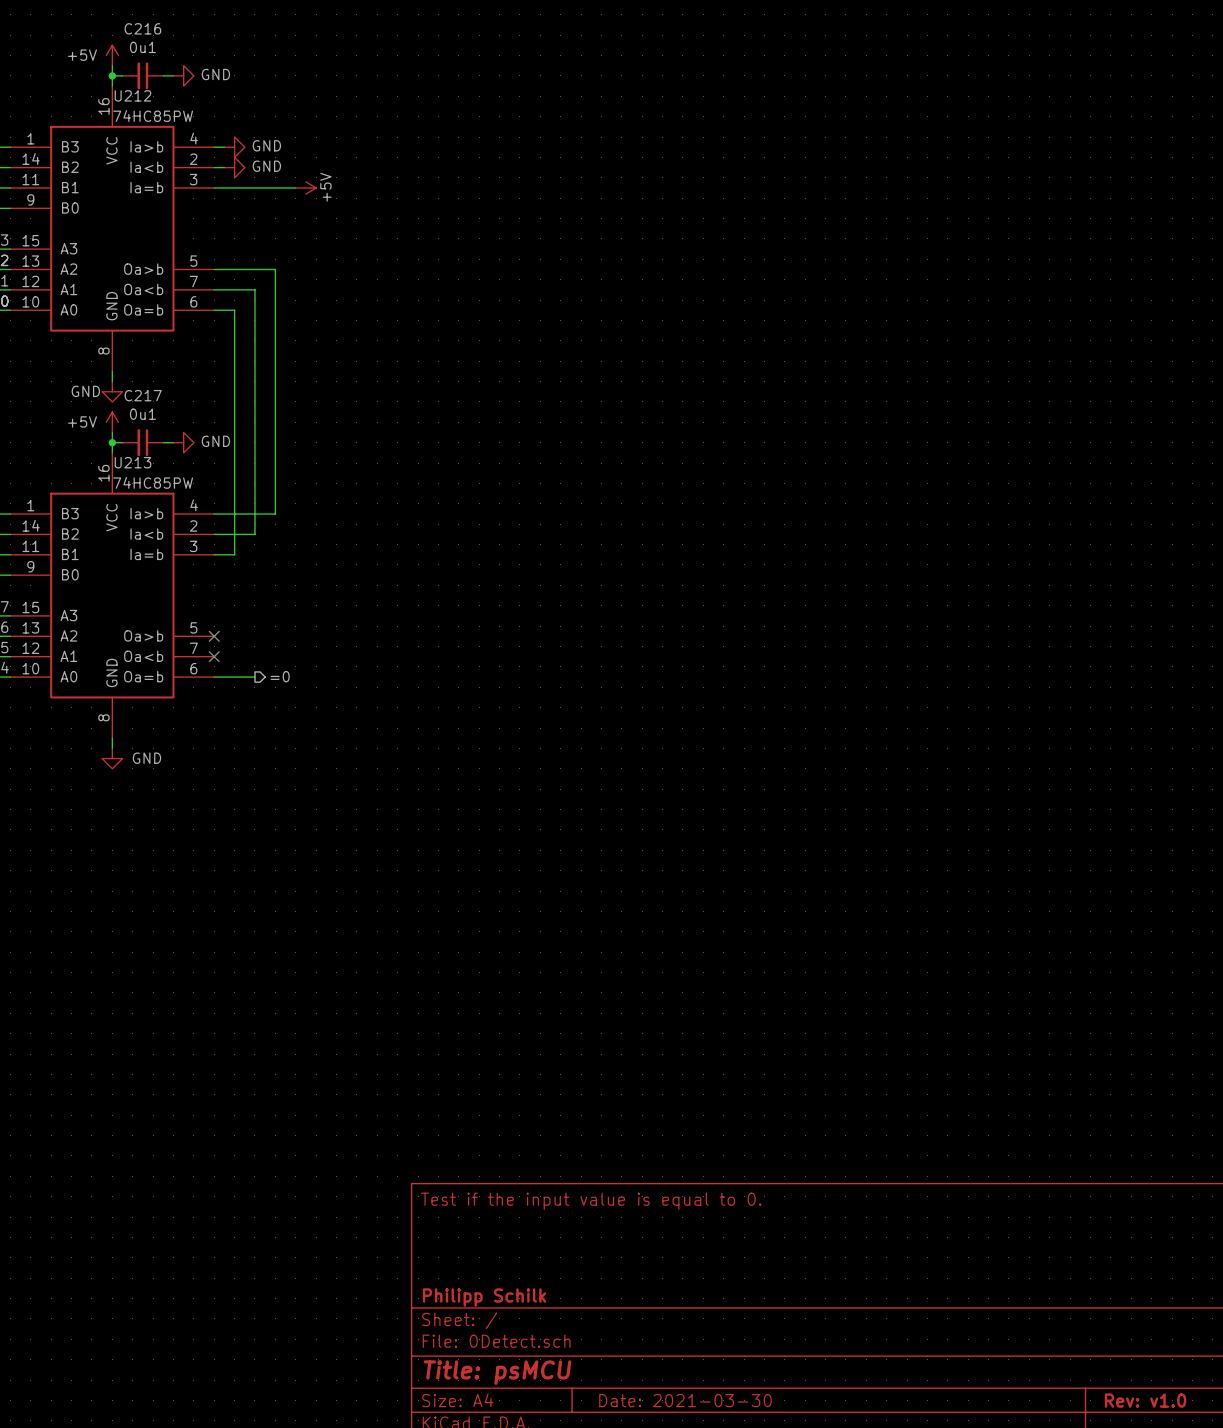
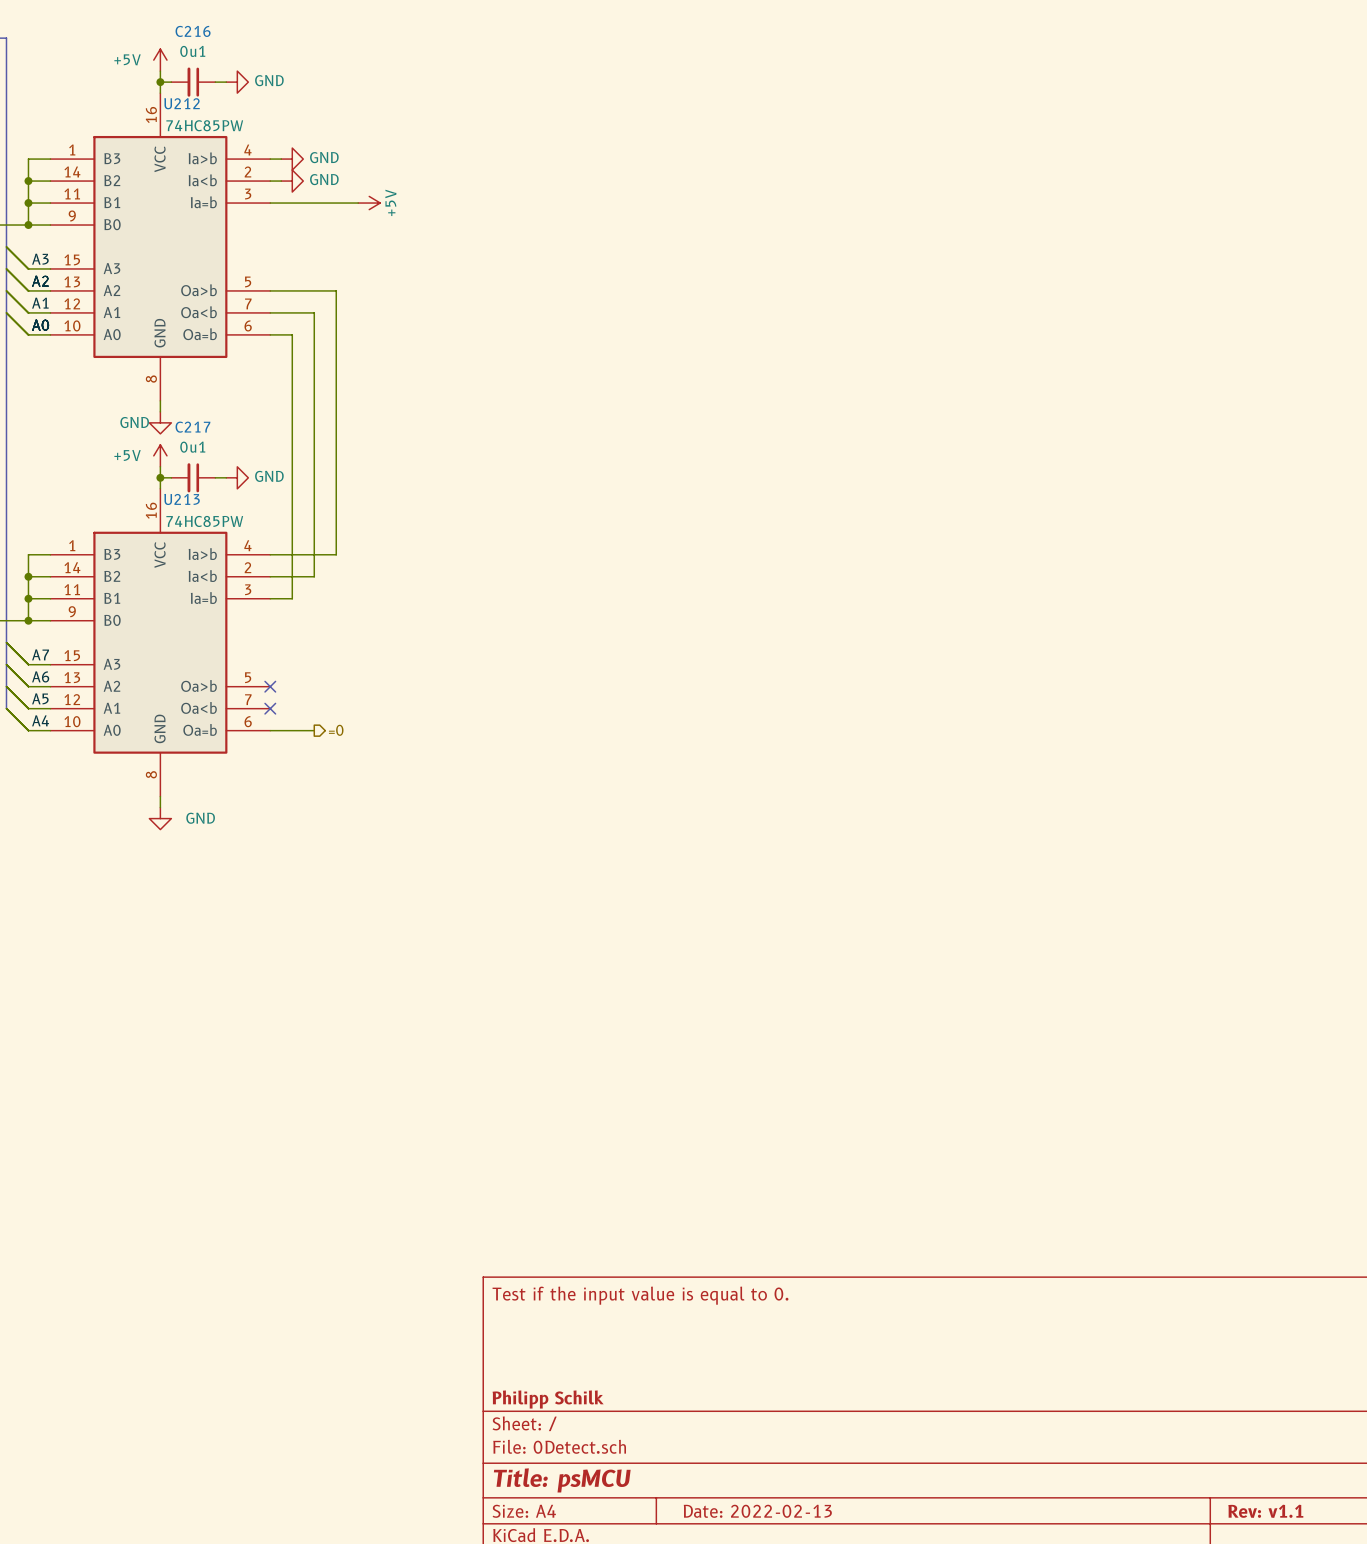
title block: Date: 2021-03-30 (685, 1400) -> Date: 2022-02-13 (757, 1511)
title block: Rev: v1.0 (1145, 1400) -> Rev: v1.1 (1265, 1511)

